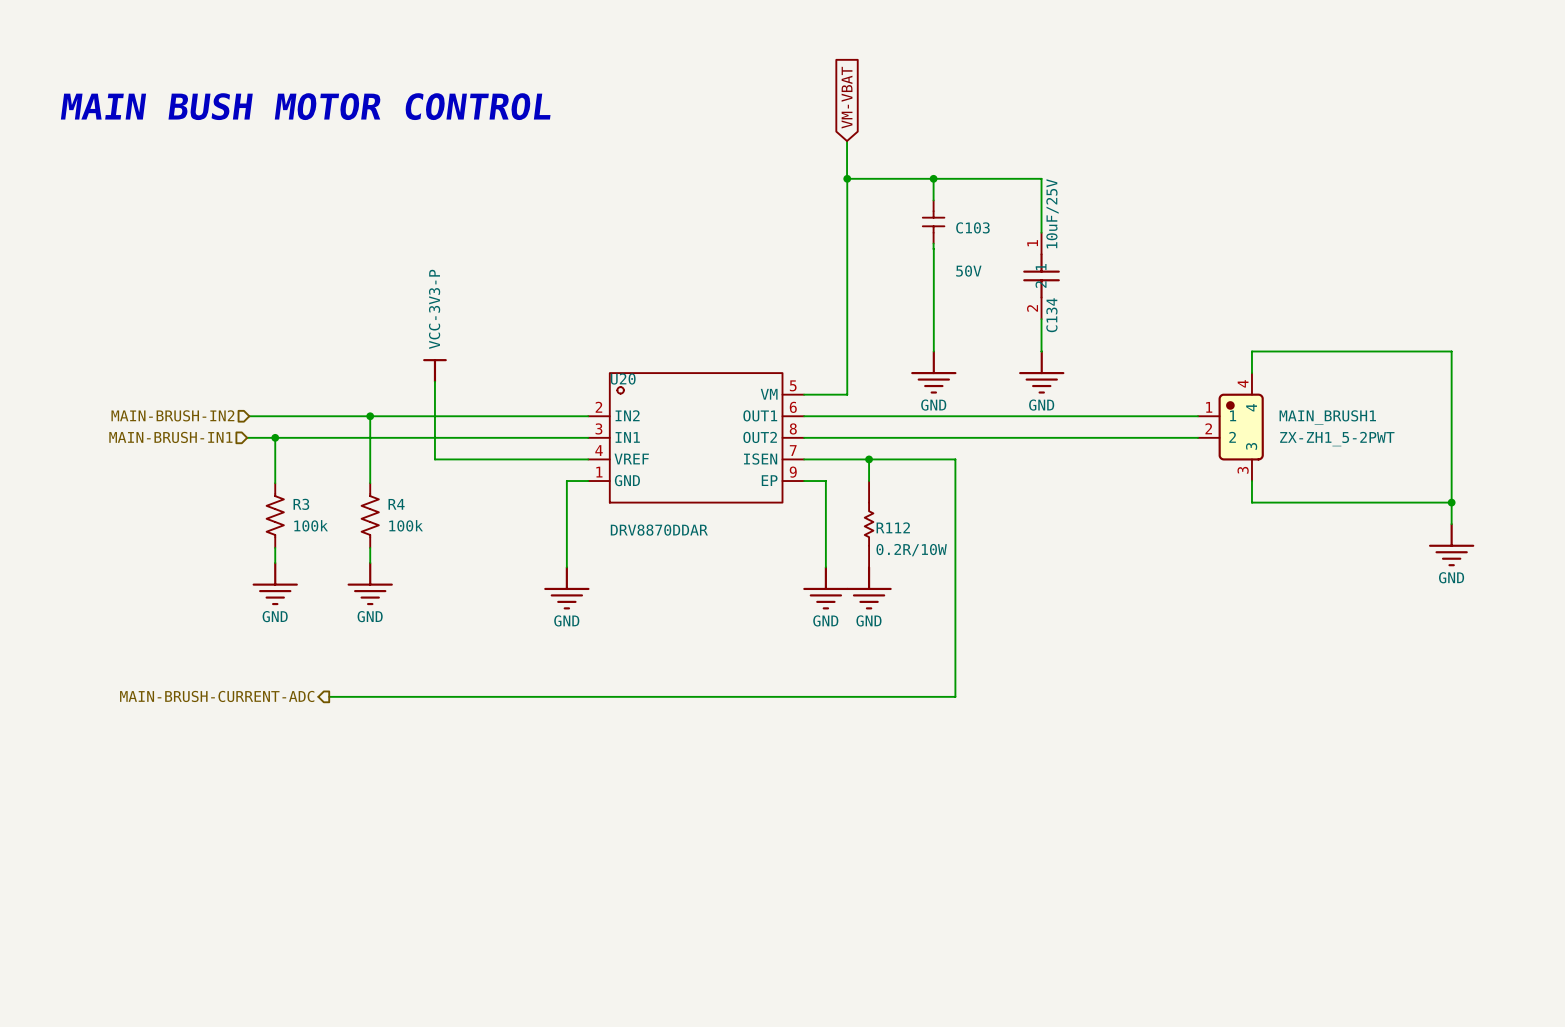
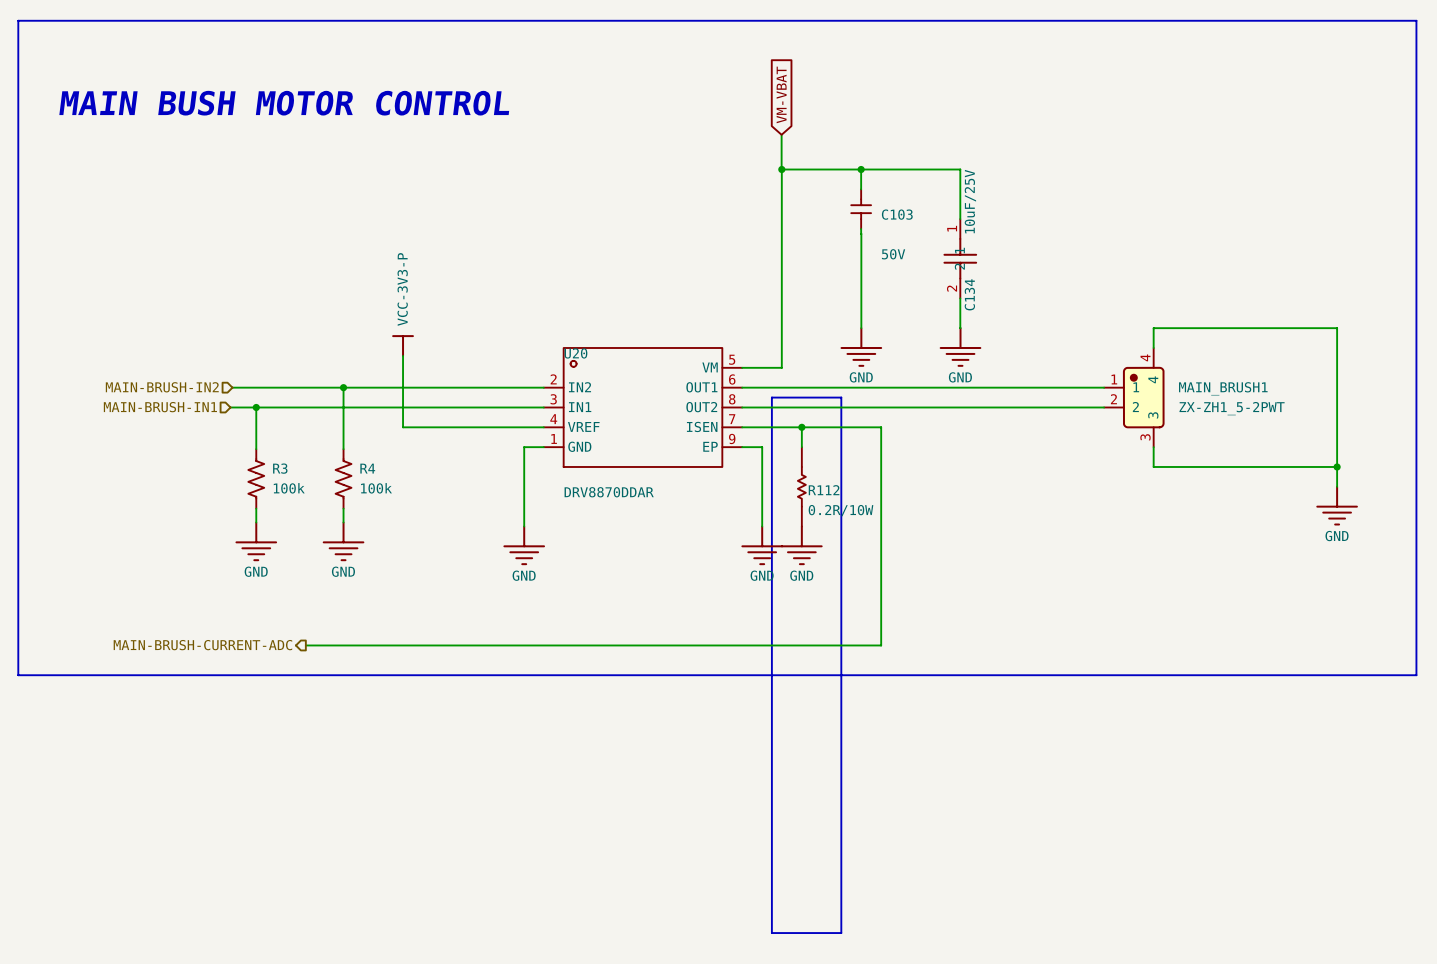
line: none -> (18, 20) (1416, 20) (1416, 675) (18, 675) (18, 20)
line: none -> (771, 397) (841, 397) (841, 933) (771, 933) (771, 397)

